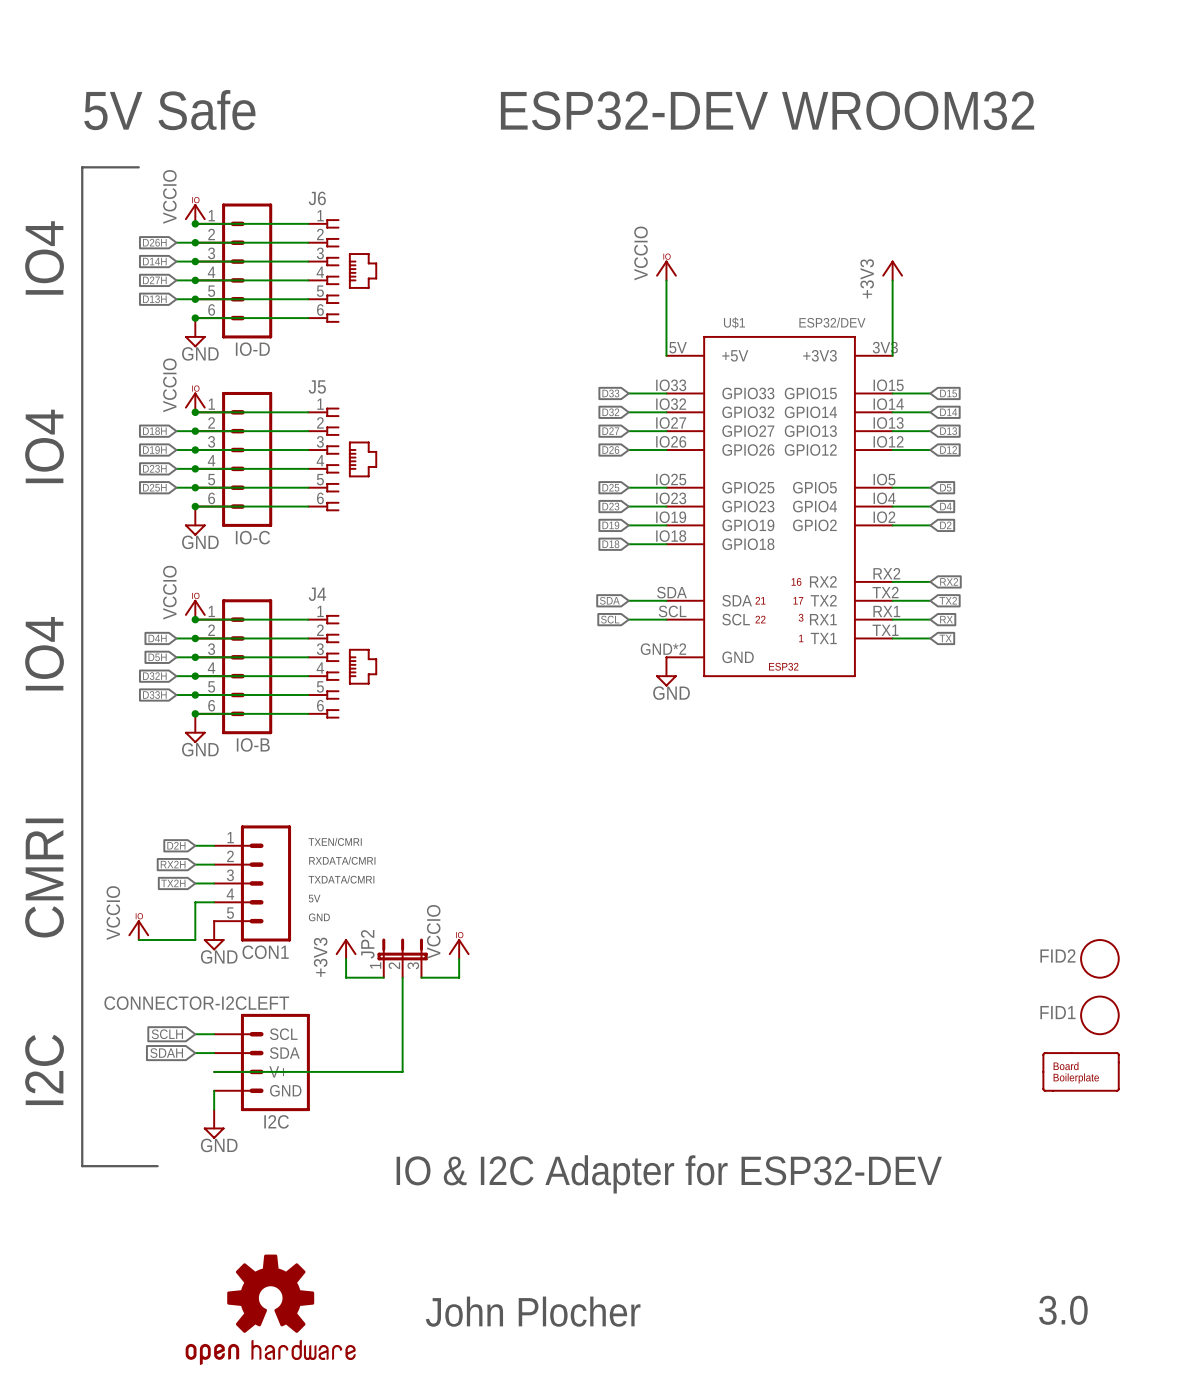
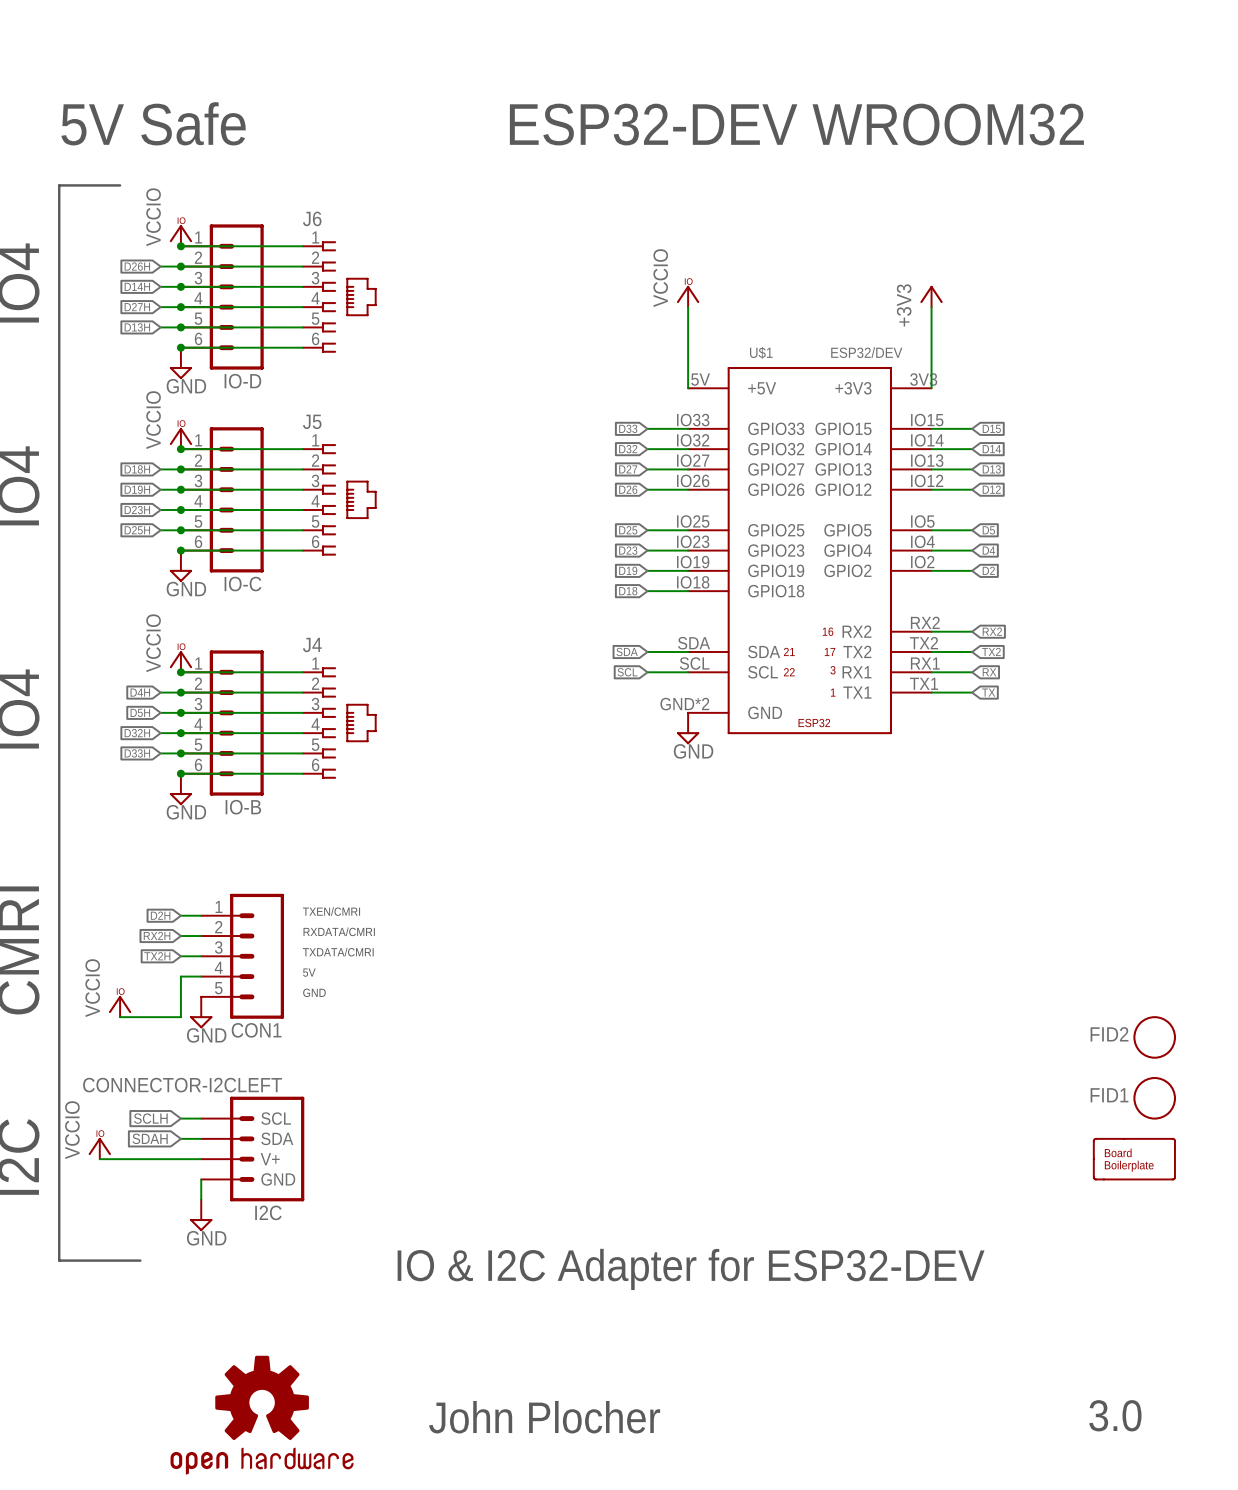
power symbol: +3V3 (346, 948) -> none
power symbol: VCCIO (459, 948) -> none
wire: (346, 958) (346, 977) (383, 977) -> none
JP2: (402, 958) -> none
wire: (459, 958) (459, 977) (421, 977) -> none
wire: (402, 977) (402, 1071) (214, 1071) -> (99, 1159) (201, 1159)
power symbol: none -> VCCIO (99, 1148)

